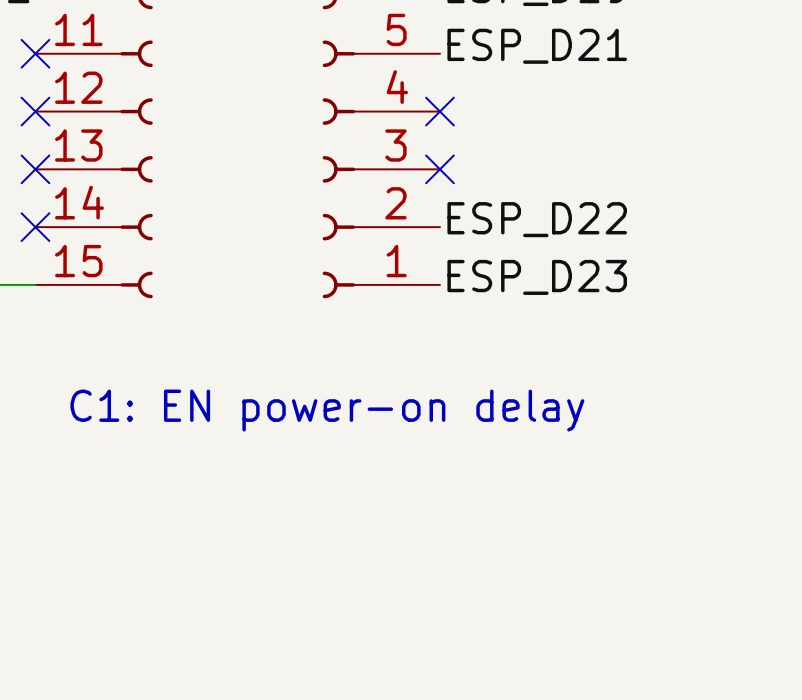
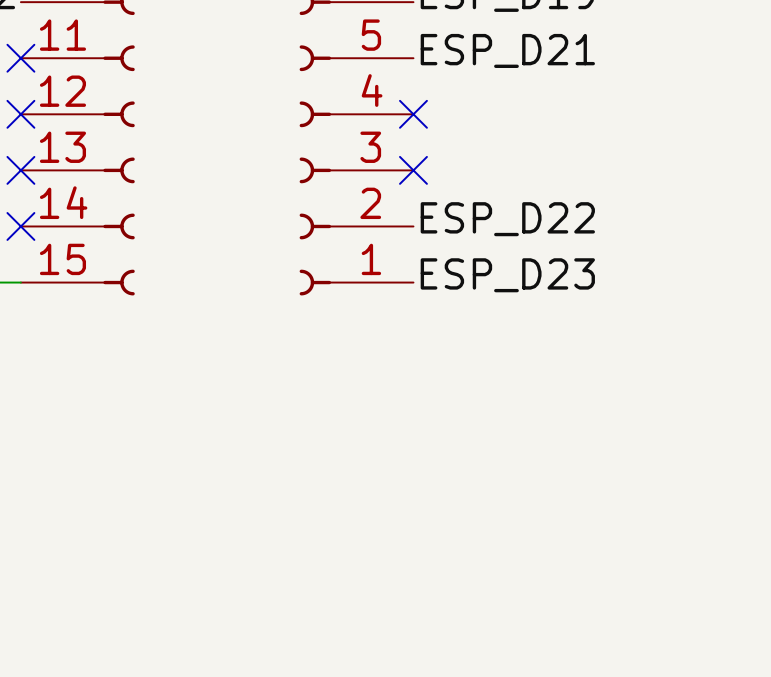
text: C1: EN power-on delay (327, 410) -> none

